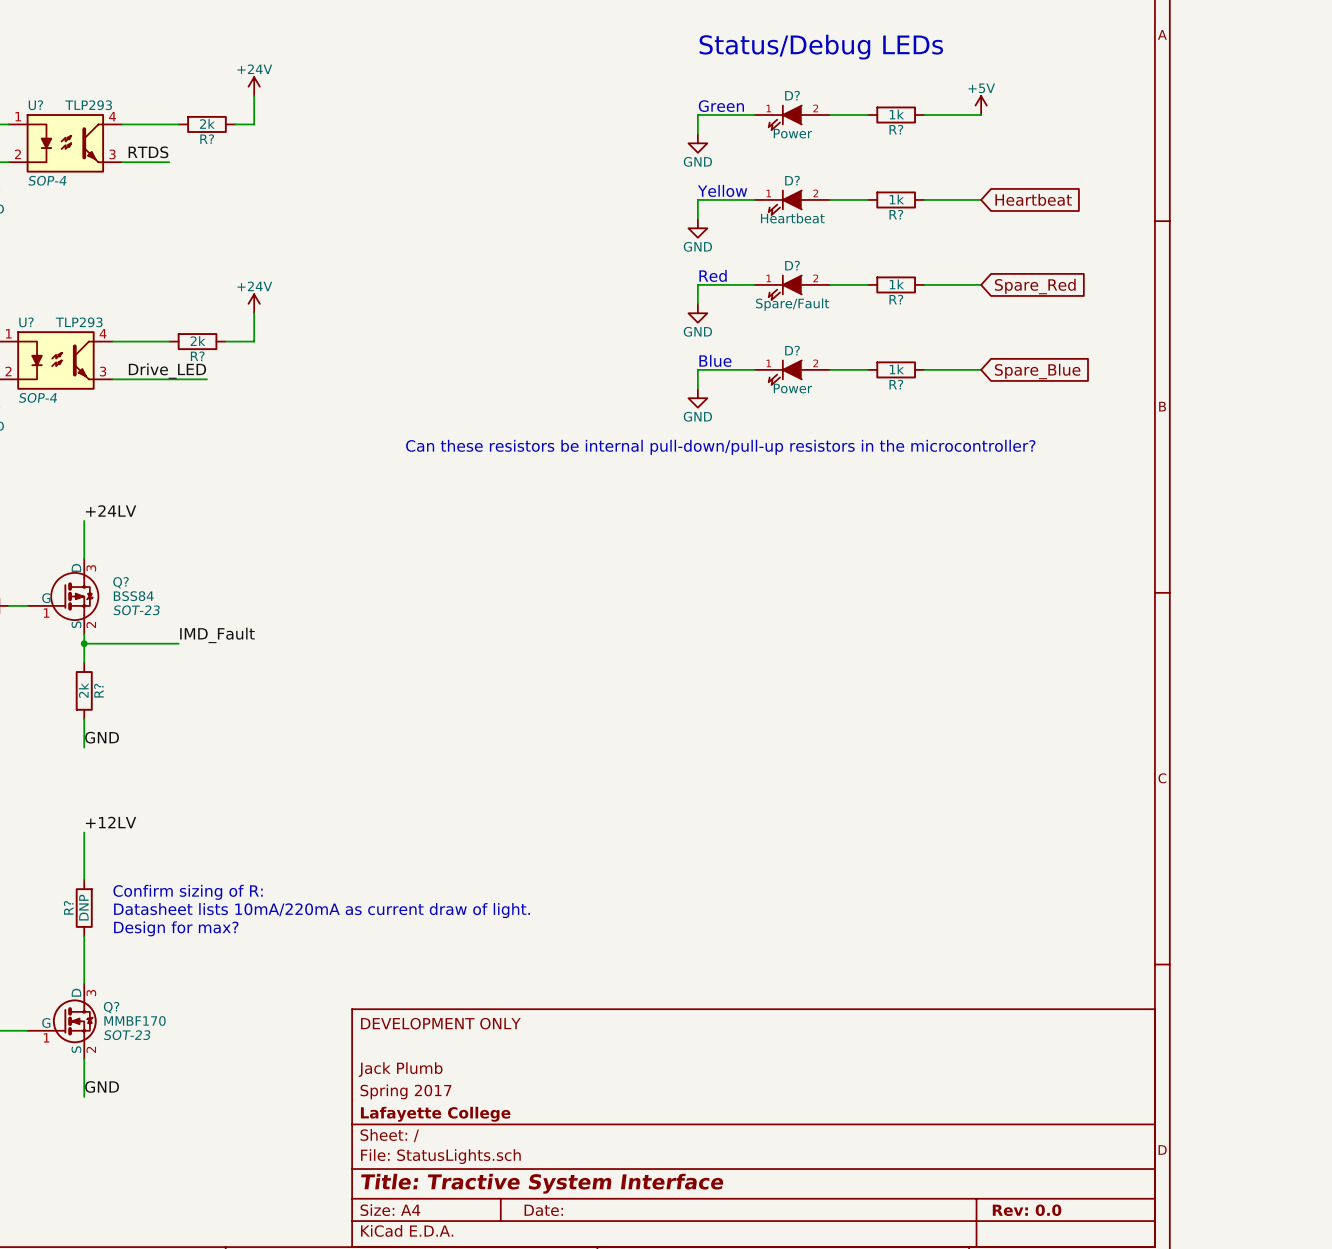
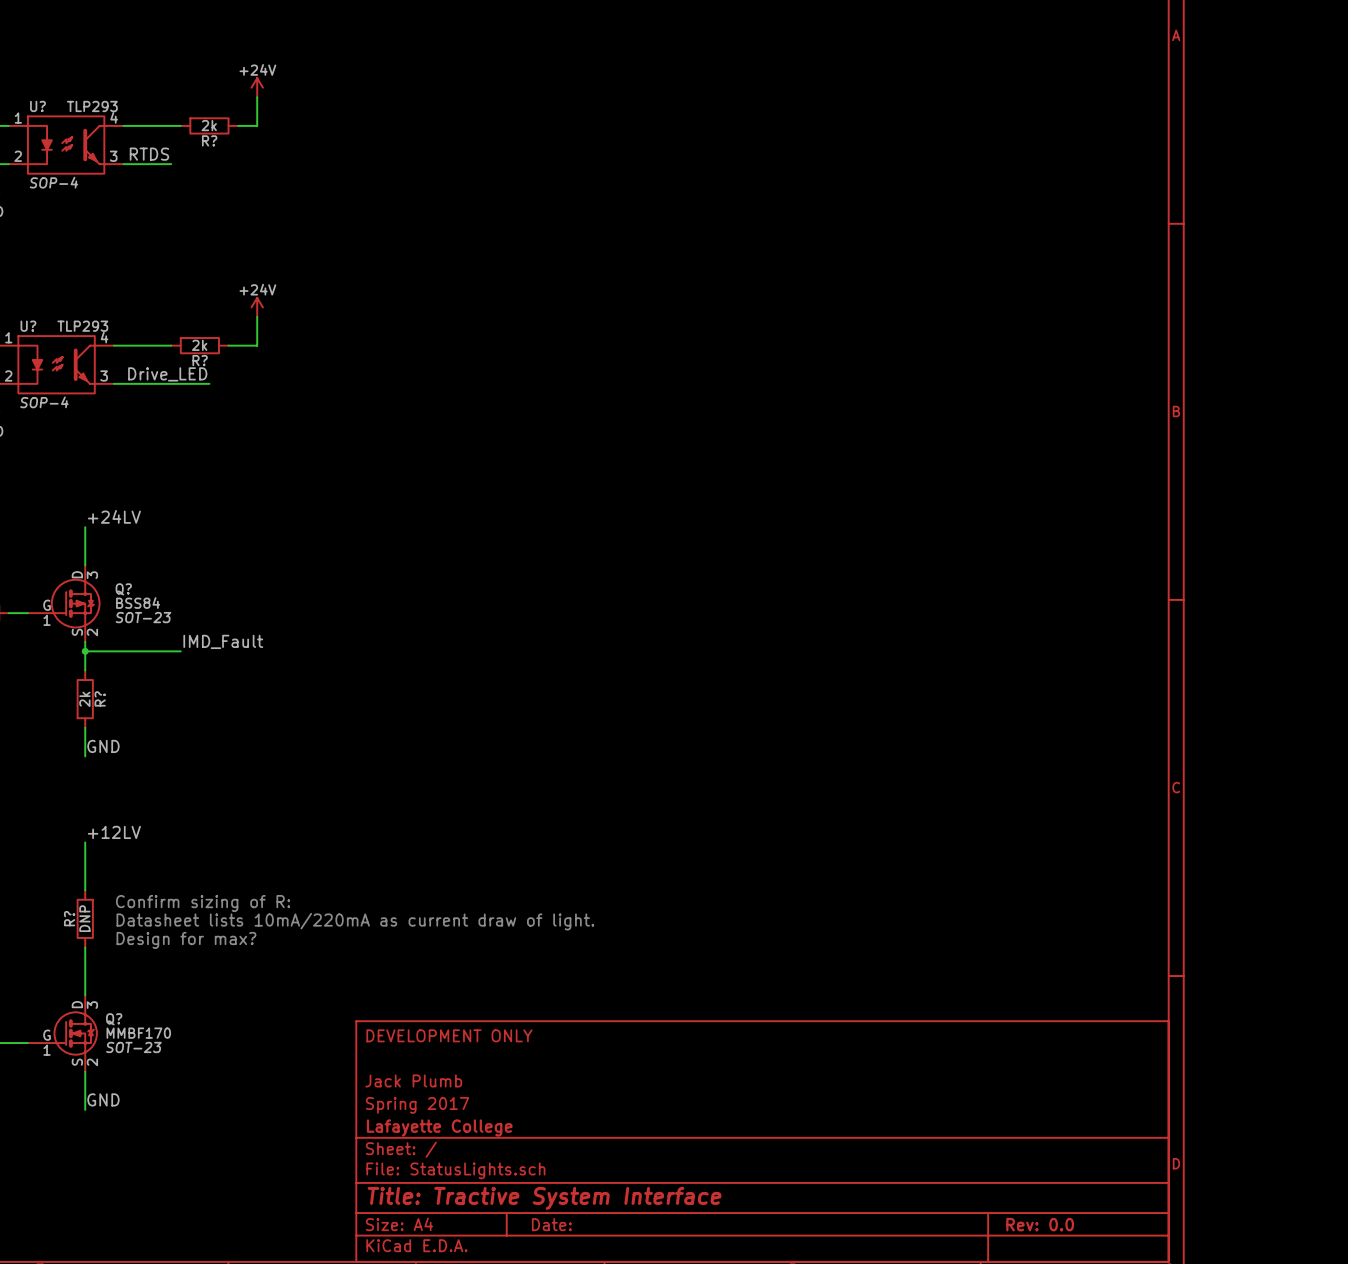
text: Status/Debug LEDs (821, 47) -> none
power symbol: +5V (981, 105) -> none
text: Green (721, 106) -> none
wire: (754, 115) (697, 115) (697, 133) -> none
wire: (830, 115) (867, 115) -> none
R?: 1k (896, 115) -> none
wire: (924, 115) (981, 115) -> none
D?: Power (792, 117) -> none
power symbol: GND (697, 143) -> none
text: Yellow (722, 190) -> none
wire: (754, 199) (697, 199) (697, 218) -> none
wire: (830, 199) (867, 199) -> none
R?: 1k (896, 199) -> none
wire: (924, 199) (981, 199) -> none
global label: Heartbeat (1033, 199) -> none
D?: Heartbeat (792, 202) -> none
power symbol: GND (697, 228) -> none
text: Red (713, 275) -> none
wire: (754, 284) (697, 284) (697, 303) -> none
wire: (830, 284) (867, 284) -> none
R?: 1k (896, 284) -> none
wire: (924, 284) (981, 284) -> none
global label: Spare_Red (1035, 286) -> none
D?: Spare/Fault (792, 287) -> none
power symbol: GND (697, 313) -> none
text: Blue (715, 360) -> none
wire: (754, 369) (697, 369) (697, 388) -> none
wire: (830, 369) (867, 369) -> none
R?: 1k (896, 369) -> none
wire: (924, 369) (981, 369) -> none
global label: Spare_Blue (1037, 371) -> none
D?: Power (792, 372) -> none
power symbol: GND (697, 398) -> none
text: Can these resistors be internal pull-down/pull-up resistors in the microcontroller? (720, 447) -> none

